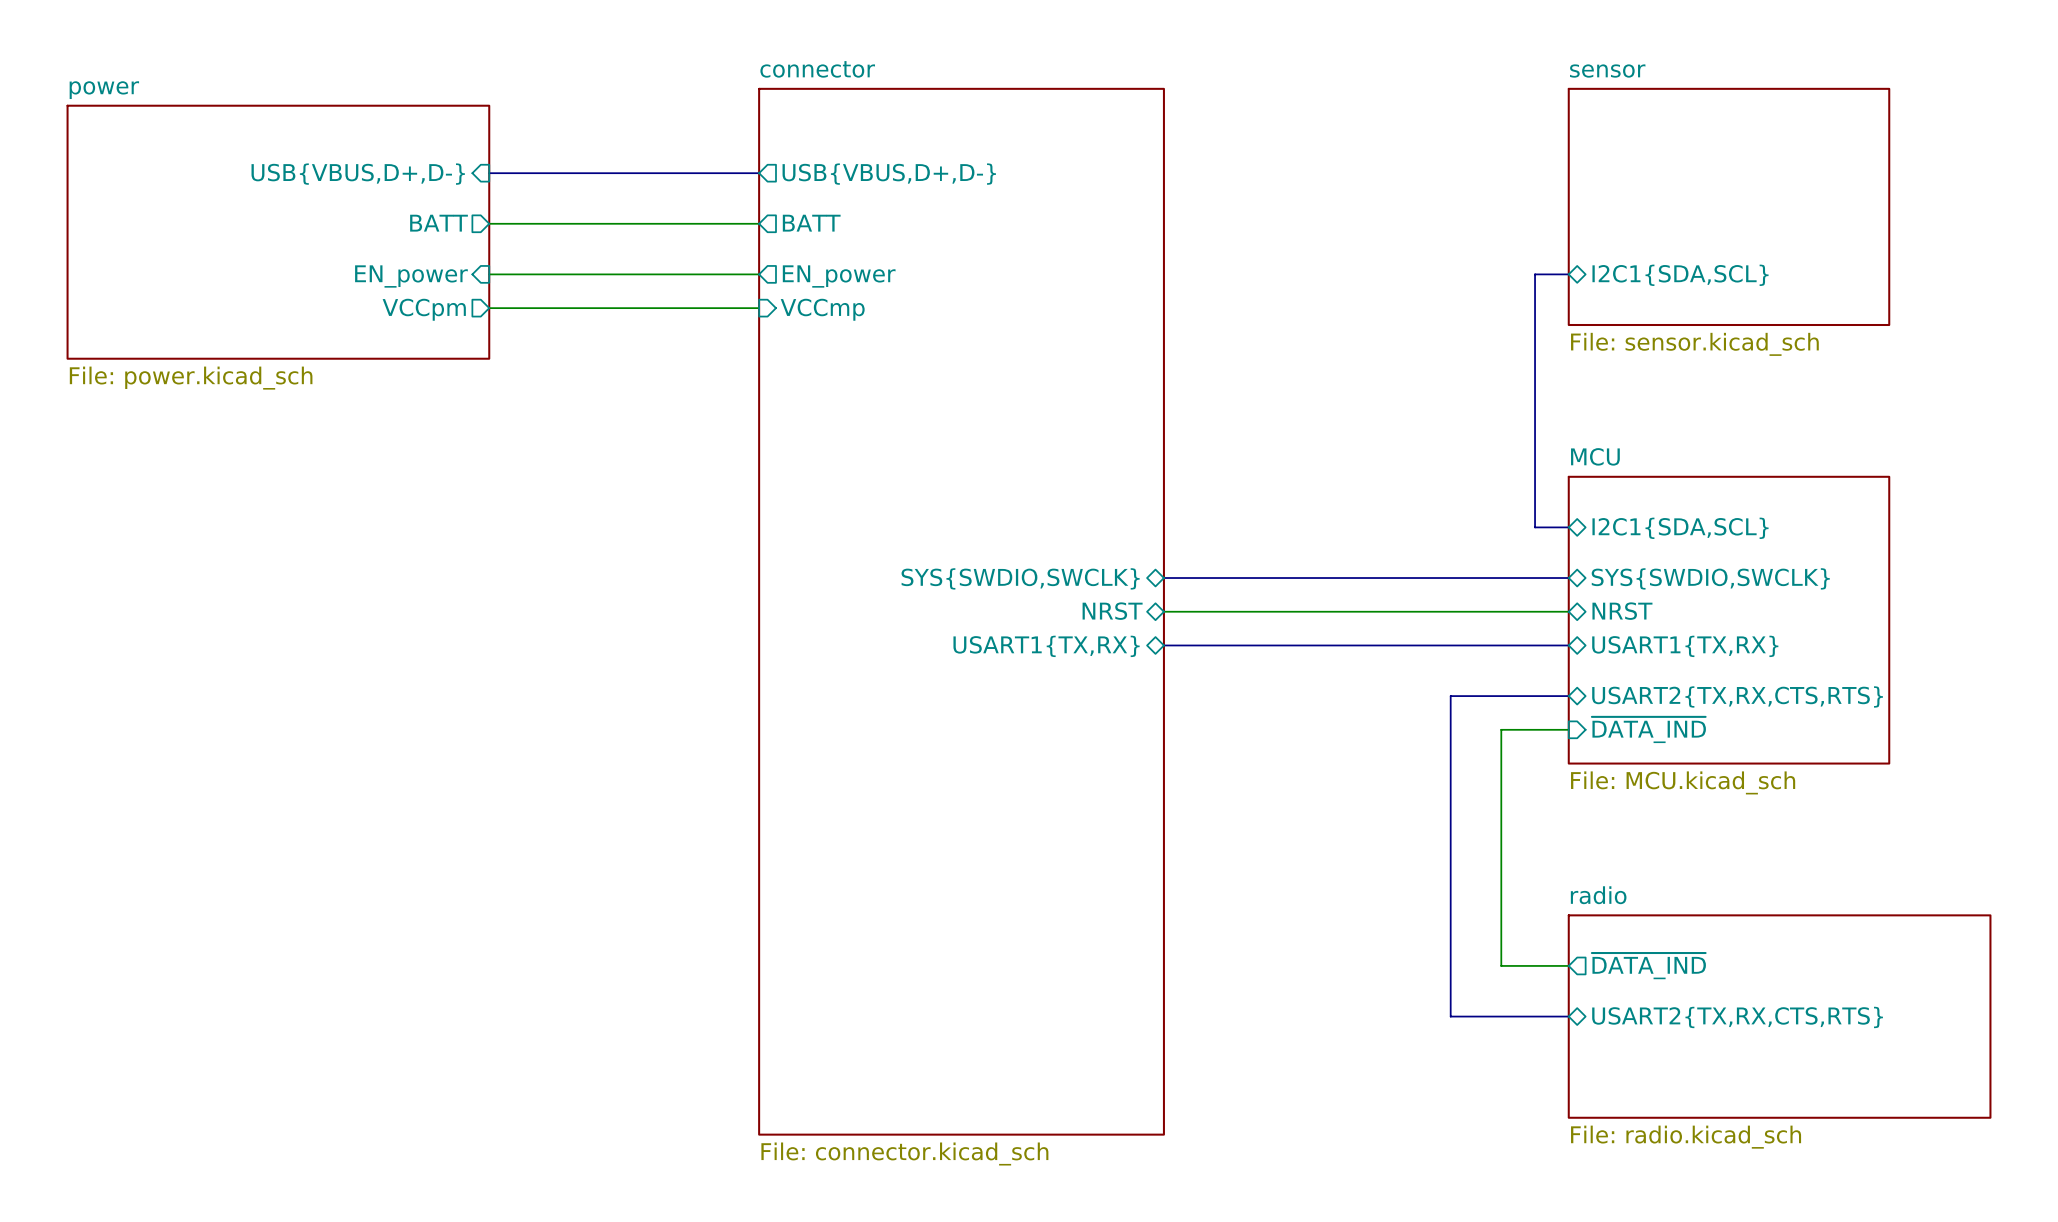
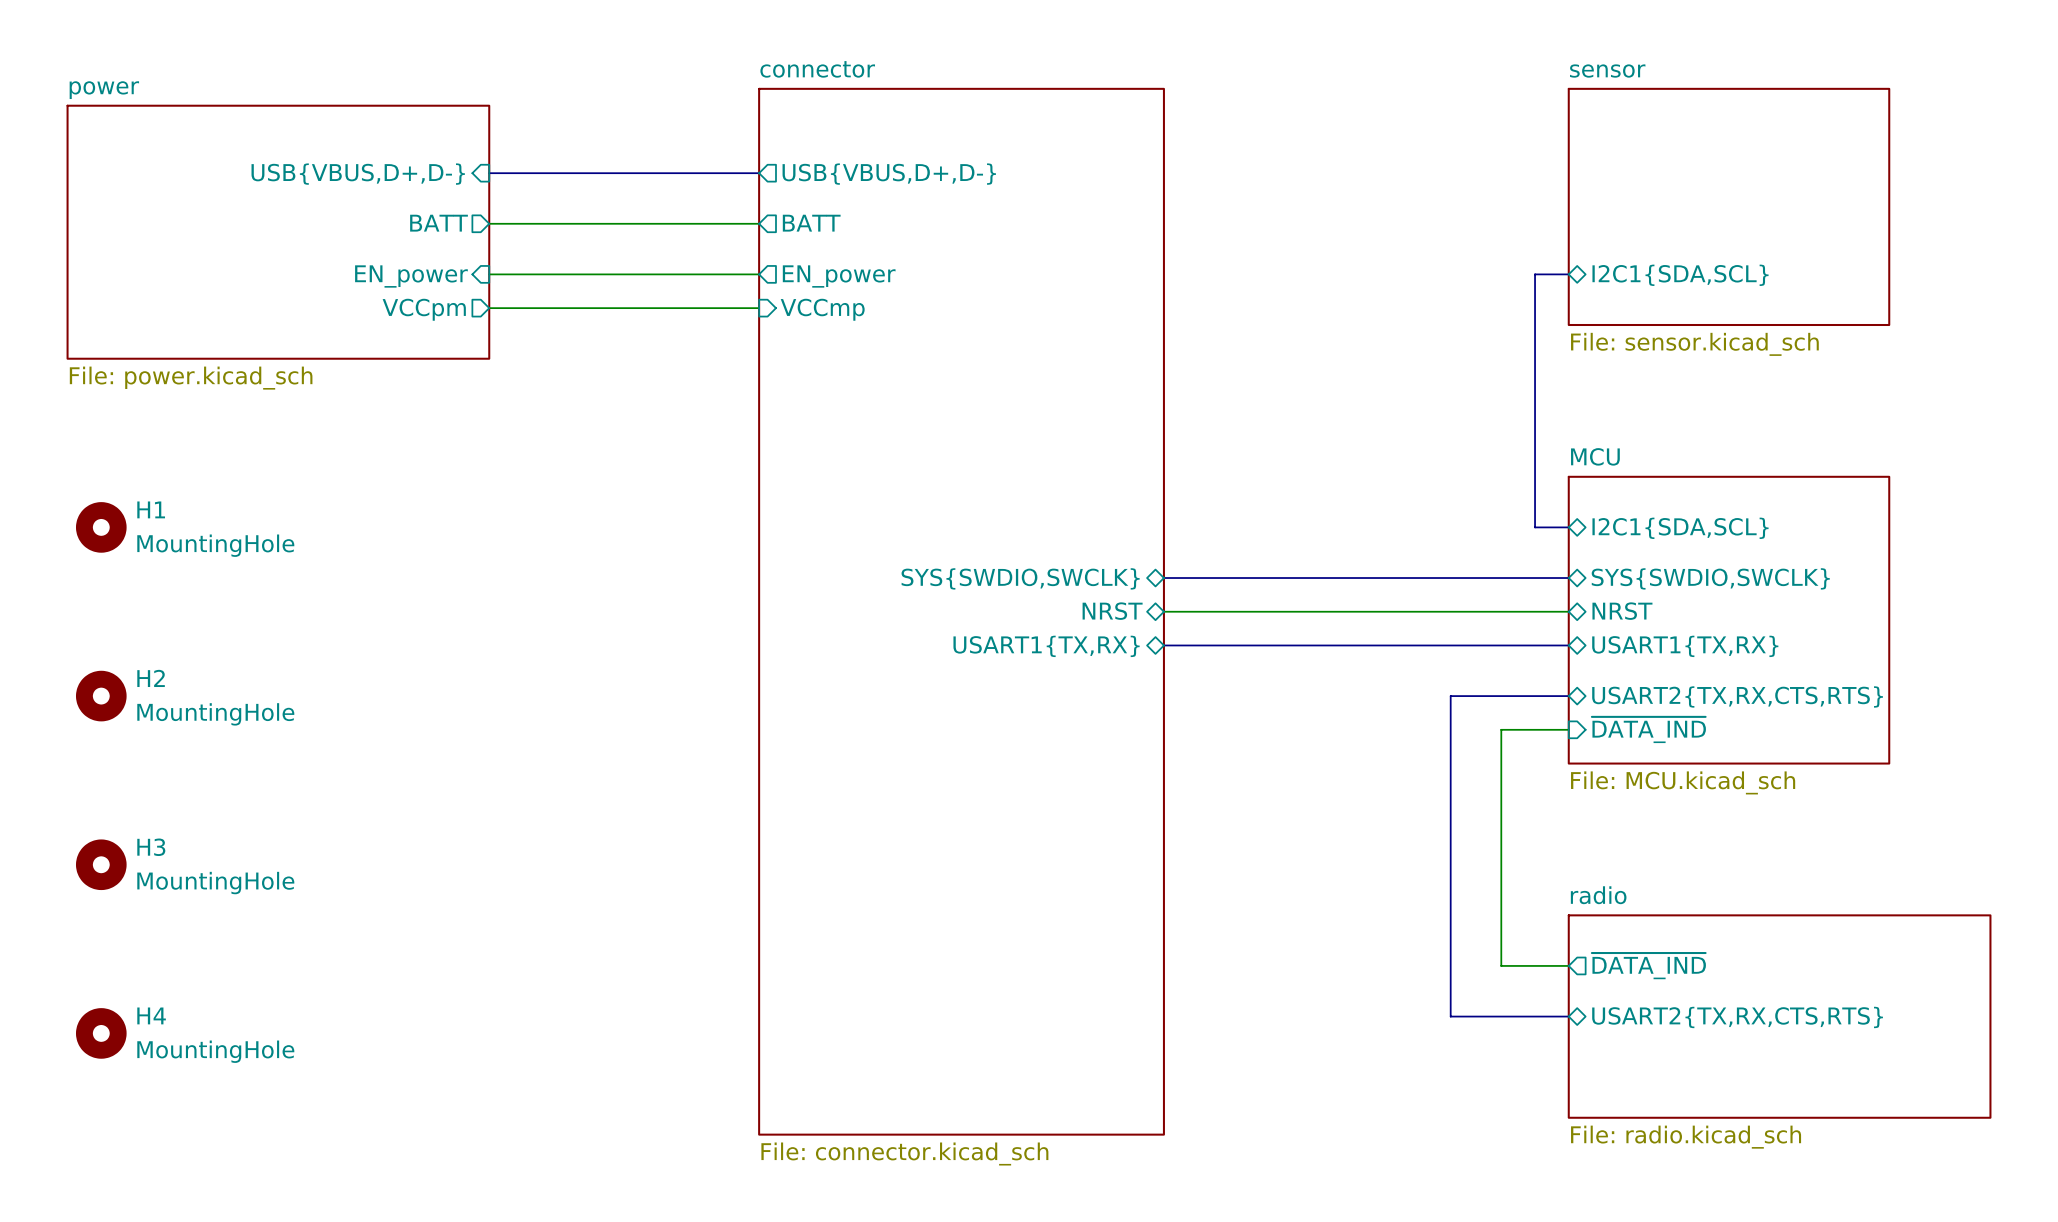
H1: none -> MountingHole (101, 527)
H2: none -> MountingHole (101, 696)
H3: none -> MountingHole (101, 864)
H4: none -> MountingHole (101, 1033)

